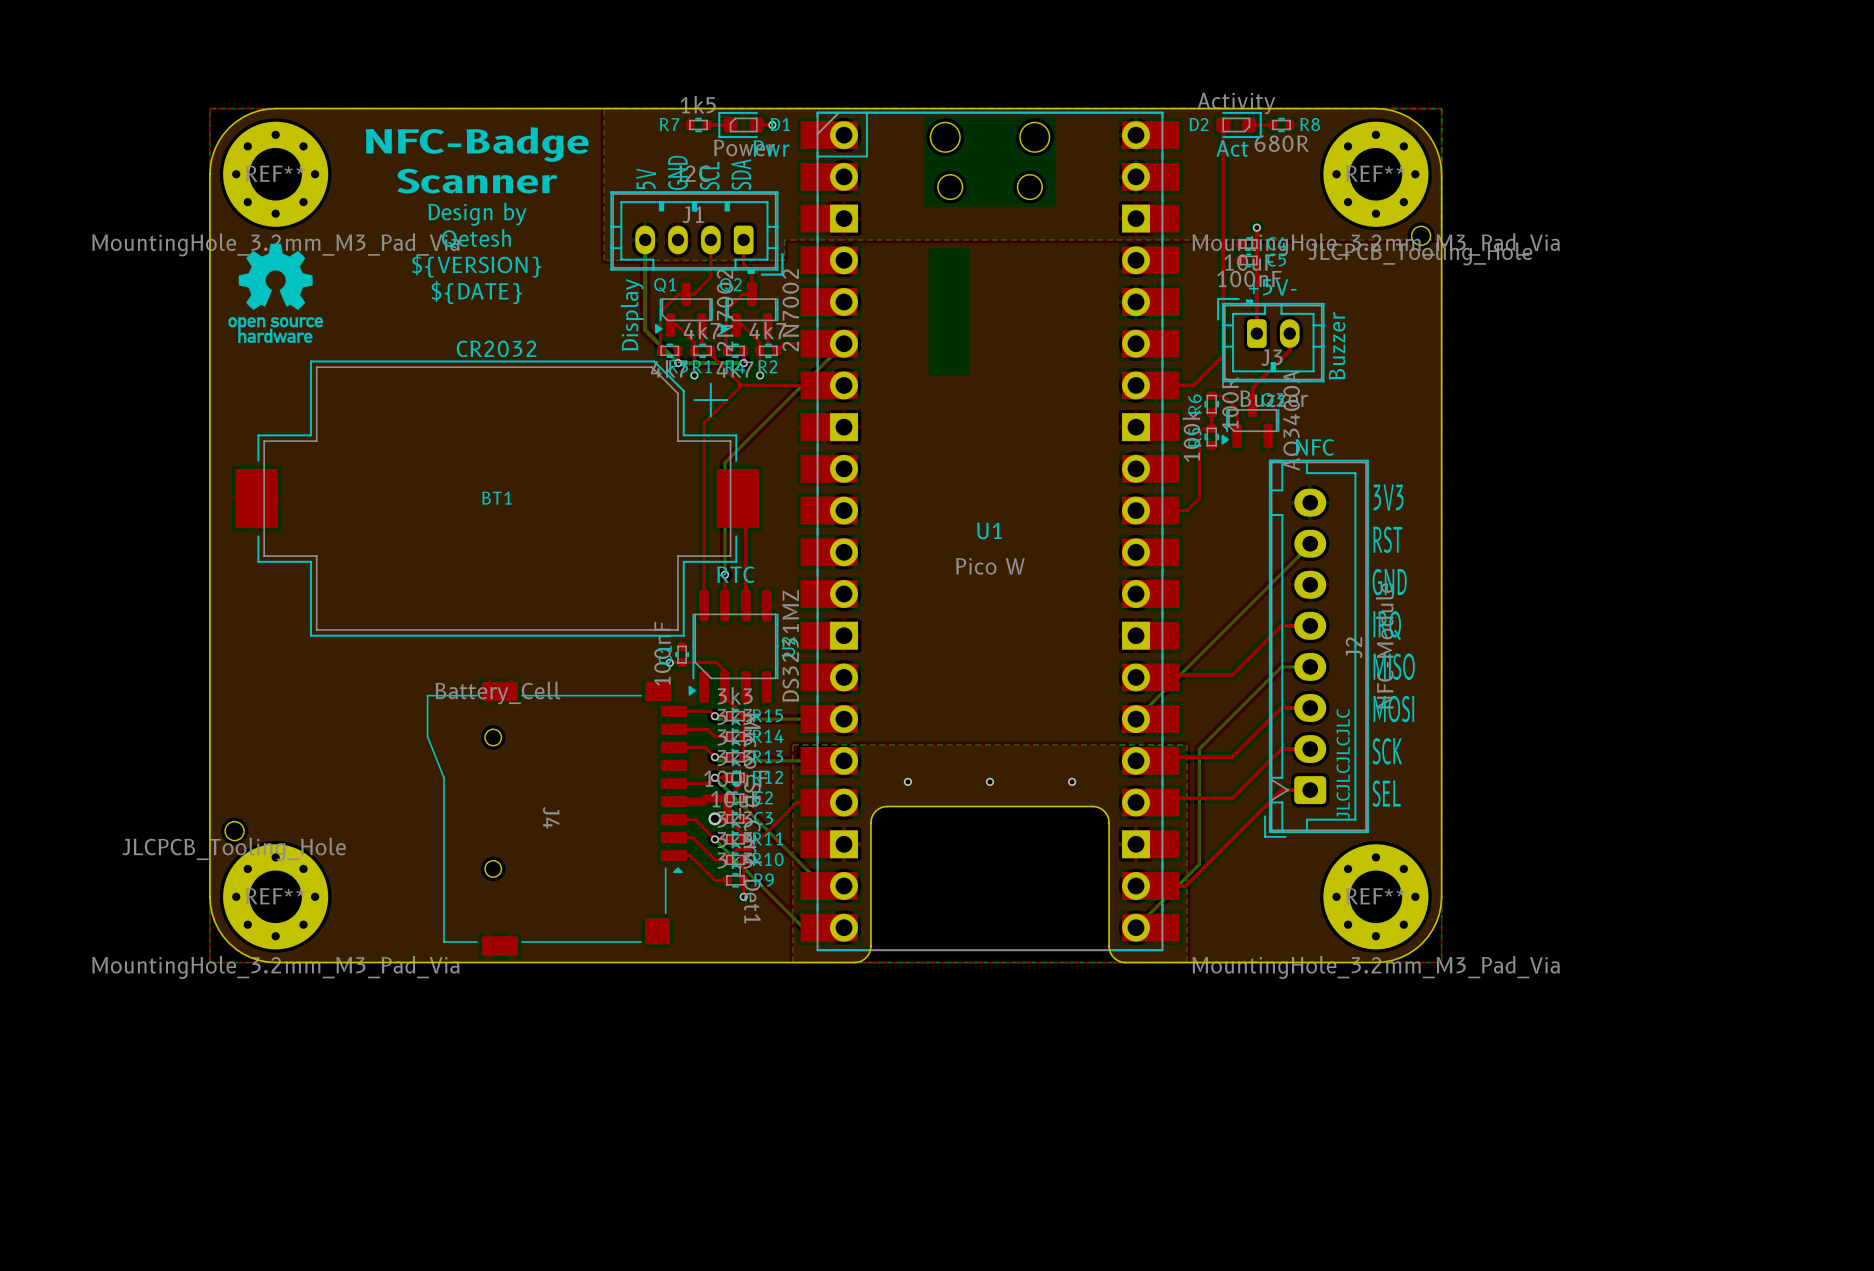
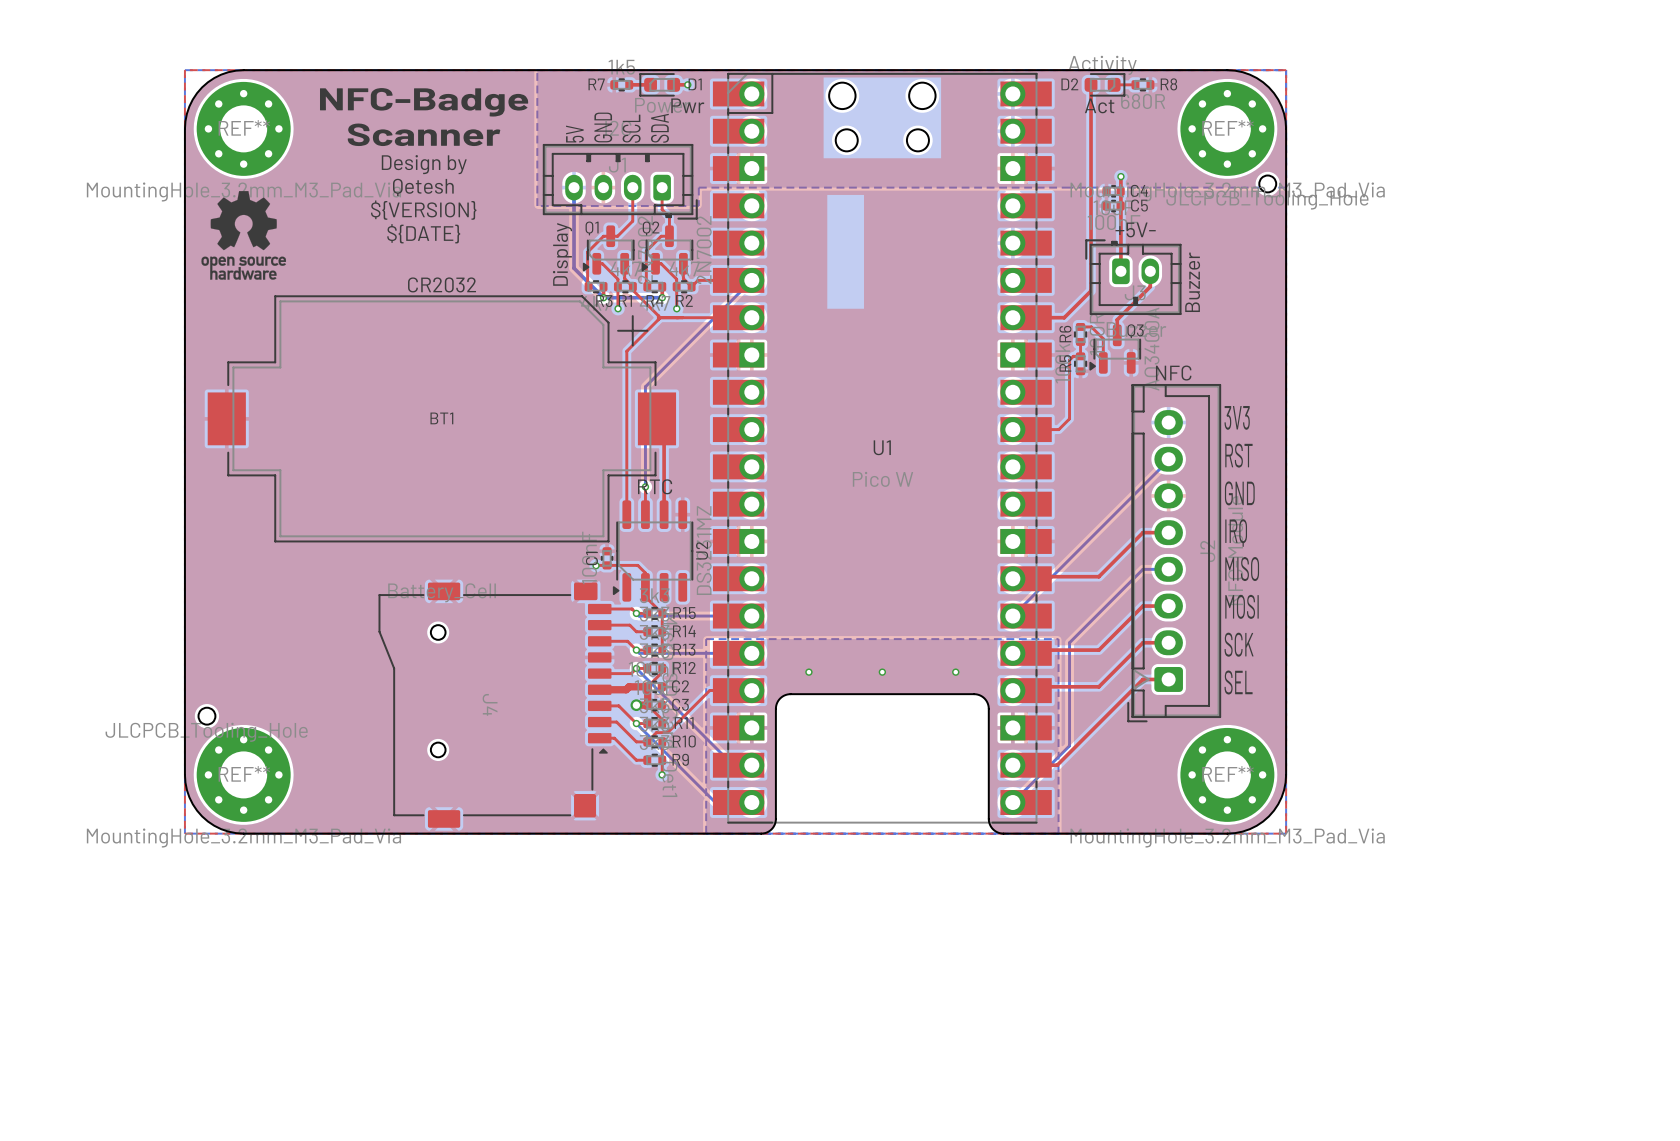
text: JLCJLCJLCJLC (1343, 763) -> none

